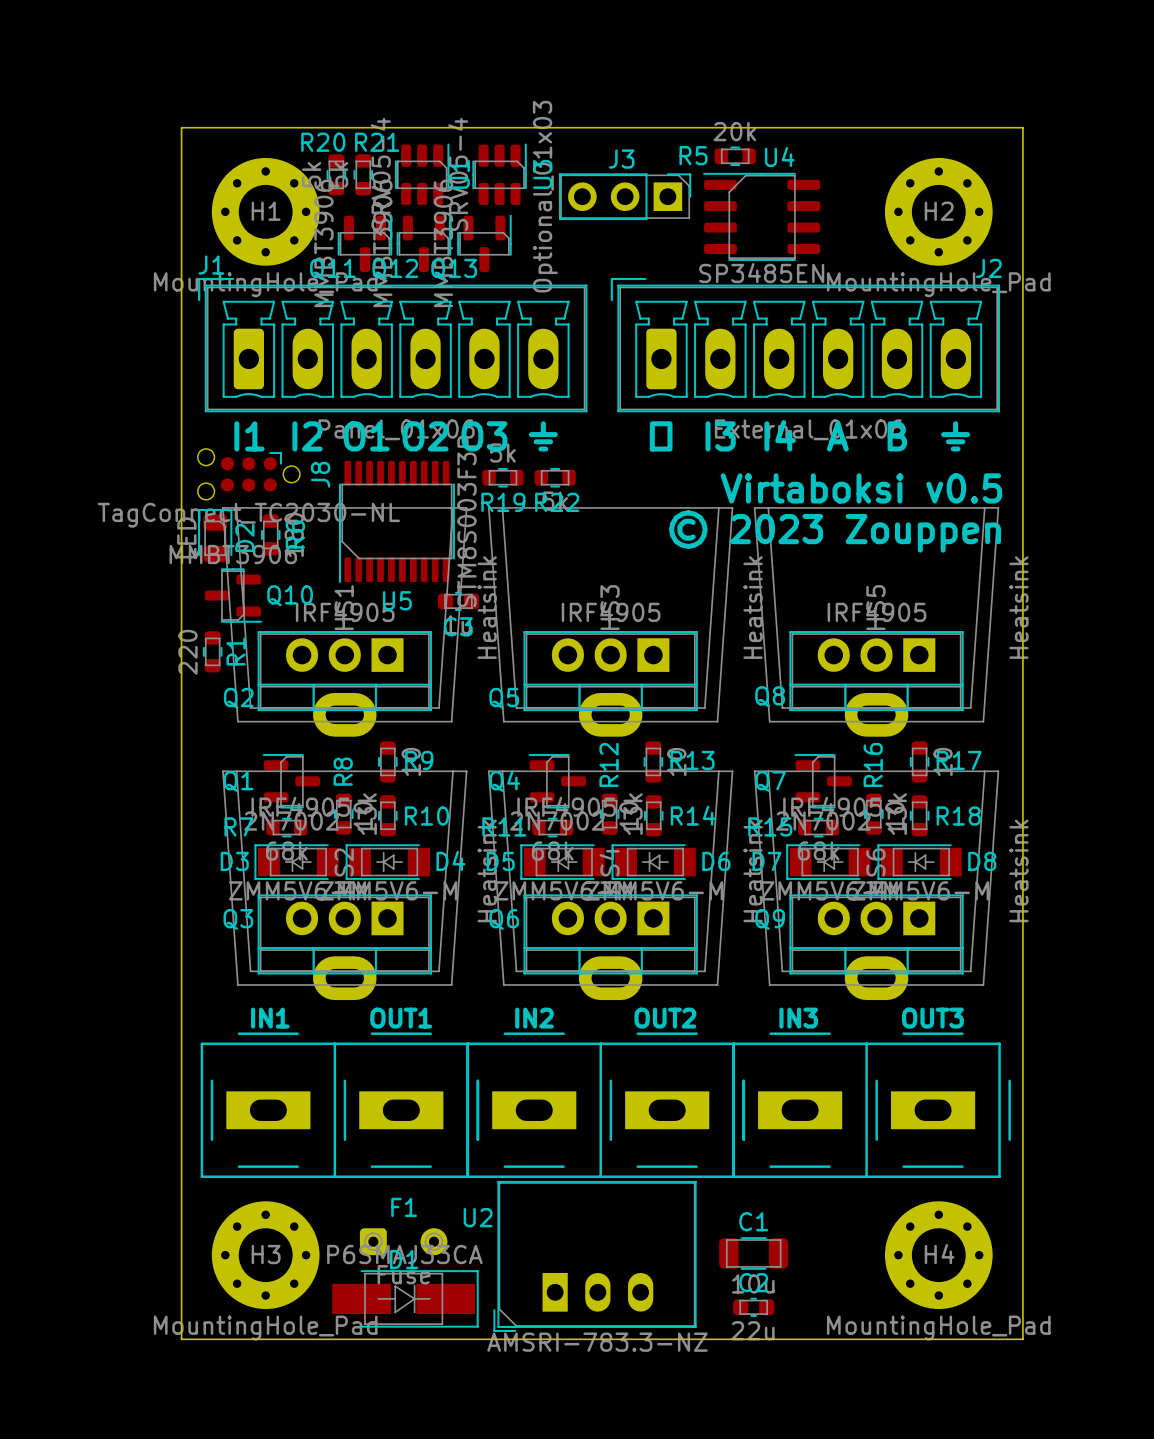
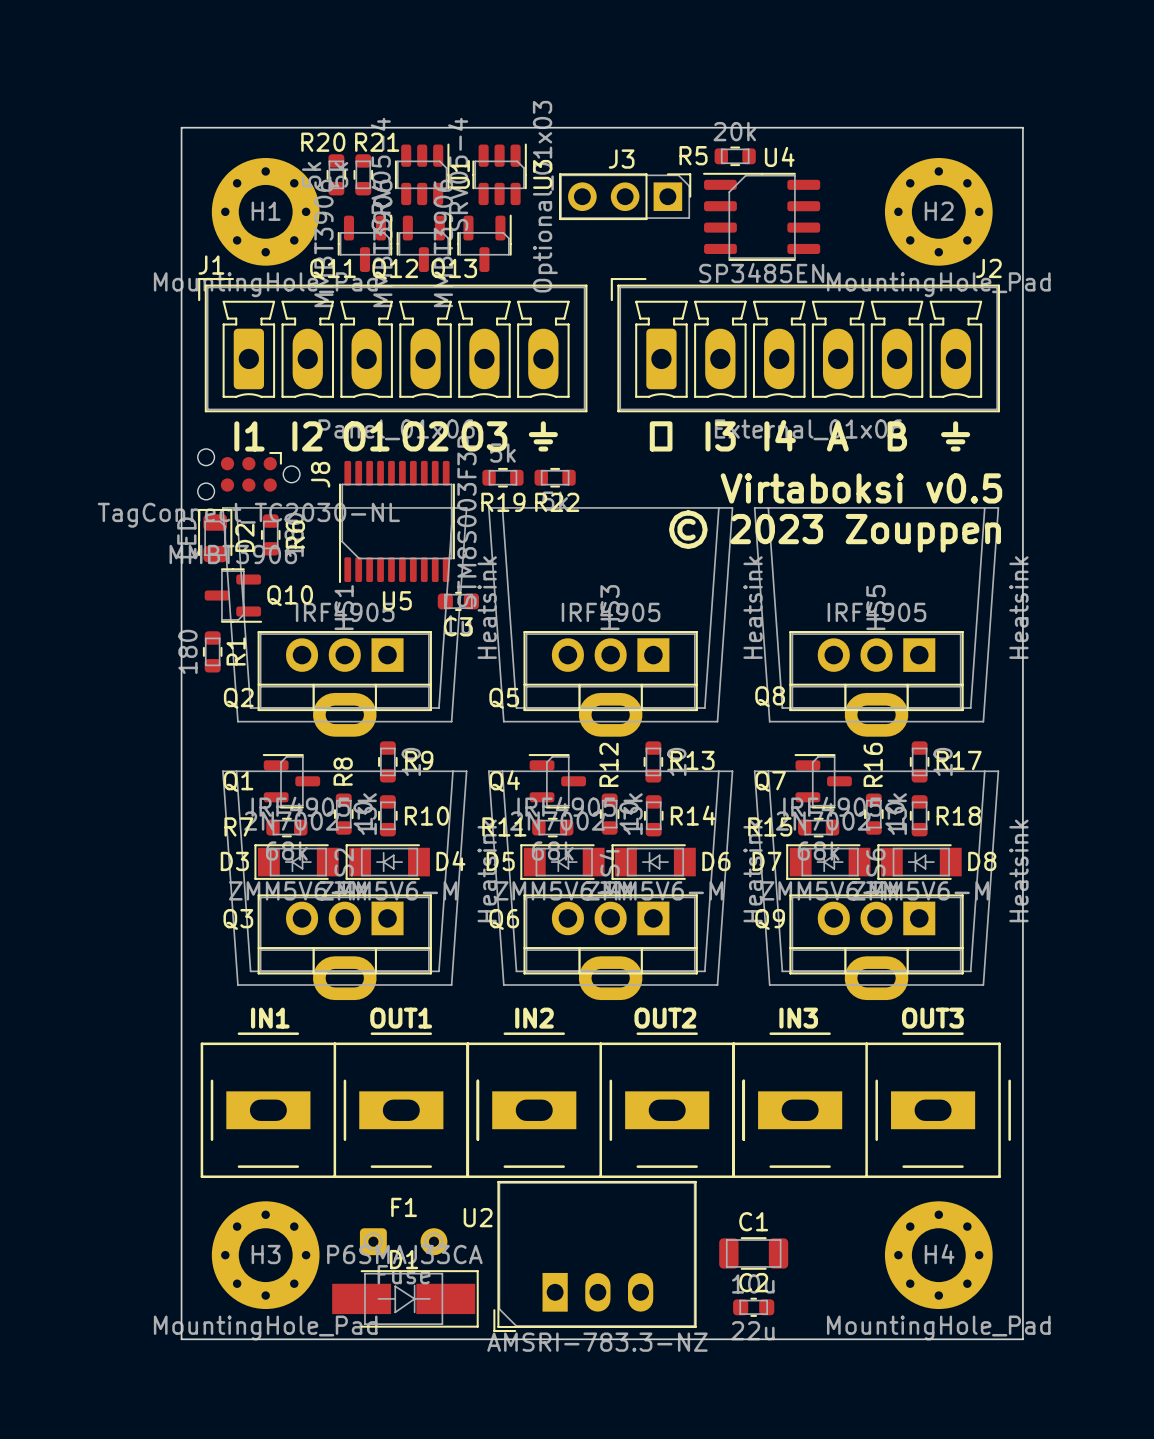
R1 value: 220 (187, 652) -> 180 (187, 651)

